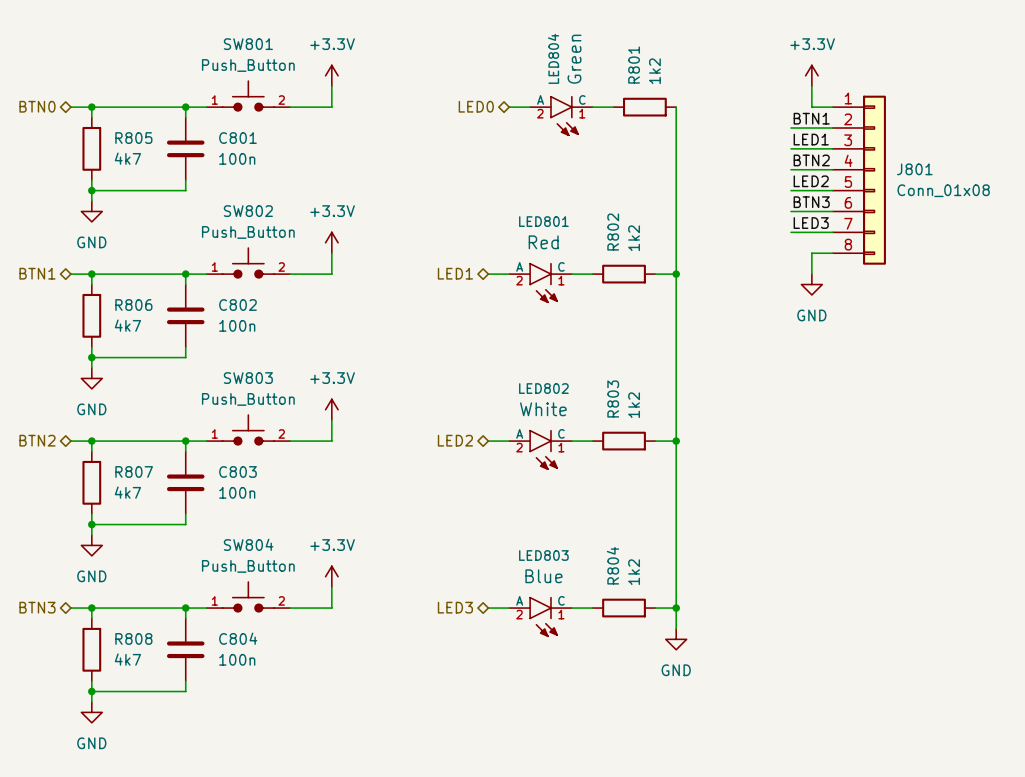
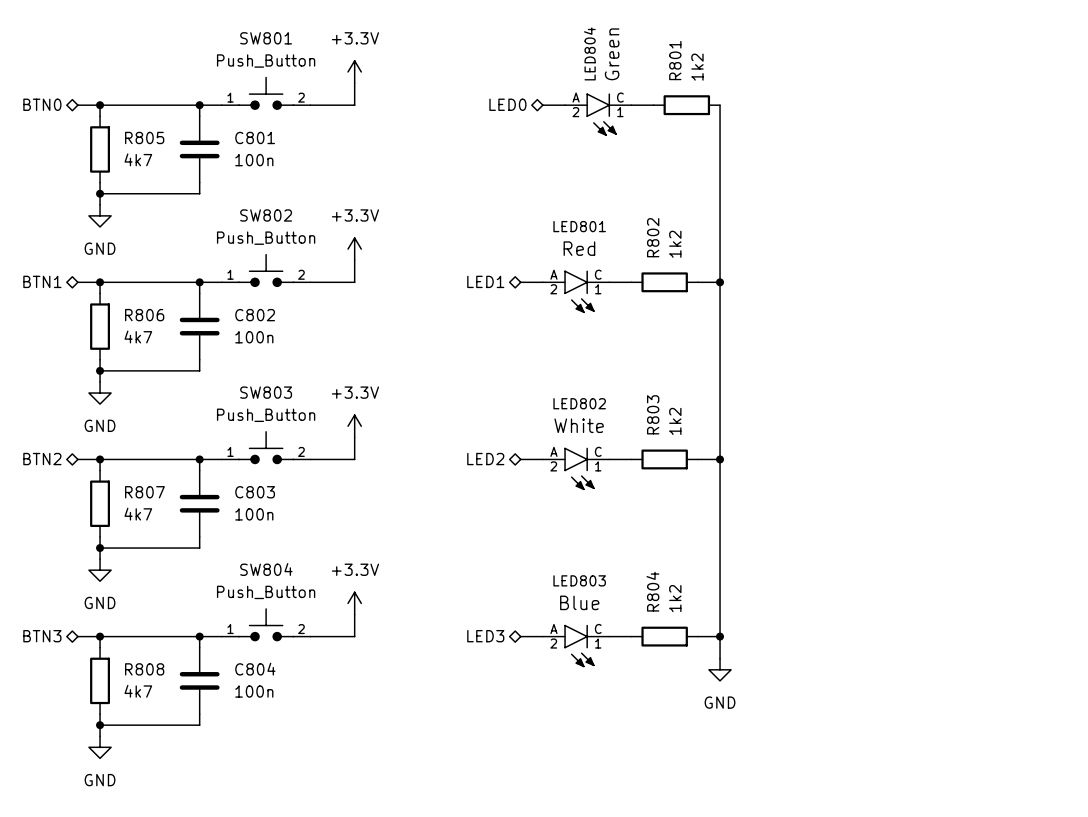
power symbol: +3.3V (811, 75) -> none
wire: (811, 86) (811, 107) (832, 107) -> none
label: BTN1 (811, 118) -> none
wire: (791, 128) (832, 128) -> none
label: LED1 (811, 139) -> none
wire: (791, 148) (832, 148) -> none
label: BTN2 (811, 160) -> none
wire: (791, 169) (832, 169) -> none
J801: Conn_01x08 (859, 180) -> none
label: LED2 (811, 181) -> none
wire: (791, 190) (832, 190) -> none
label: BTN3 (811, 202) -> none
wire: (791, 211) (832, 211) -> none
label: LED3 (811, 223) -> none
wire: (791, 232) (832, 232) -> none
wire: (832, 253) (811, 253) (811, 274) -> none
power symbol: GND (811, 284) -> none

